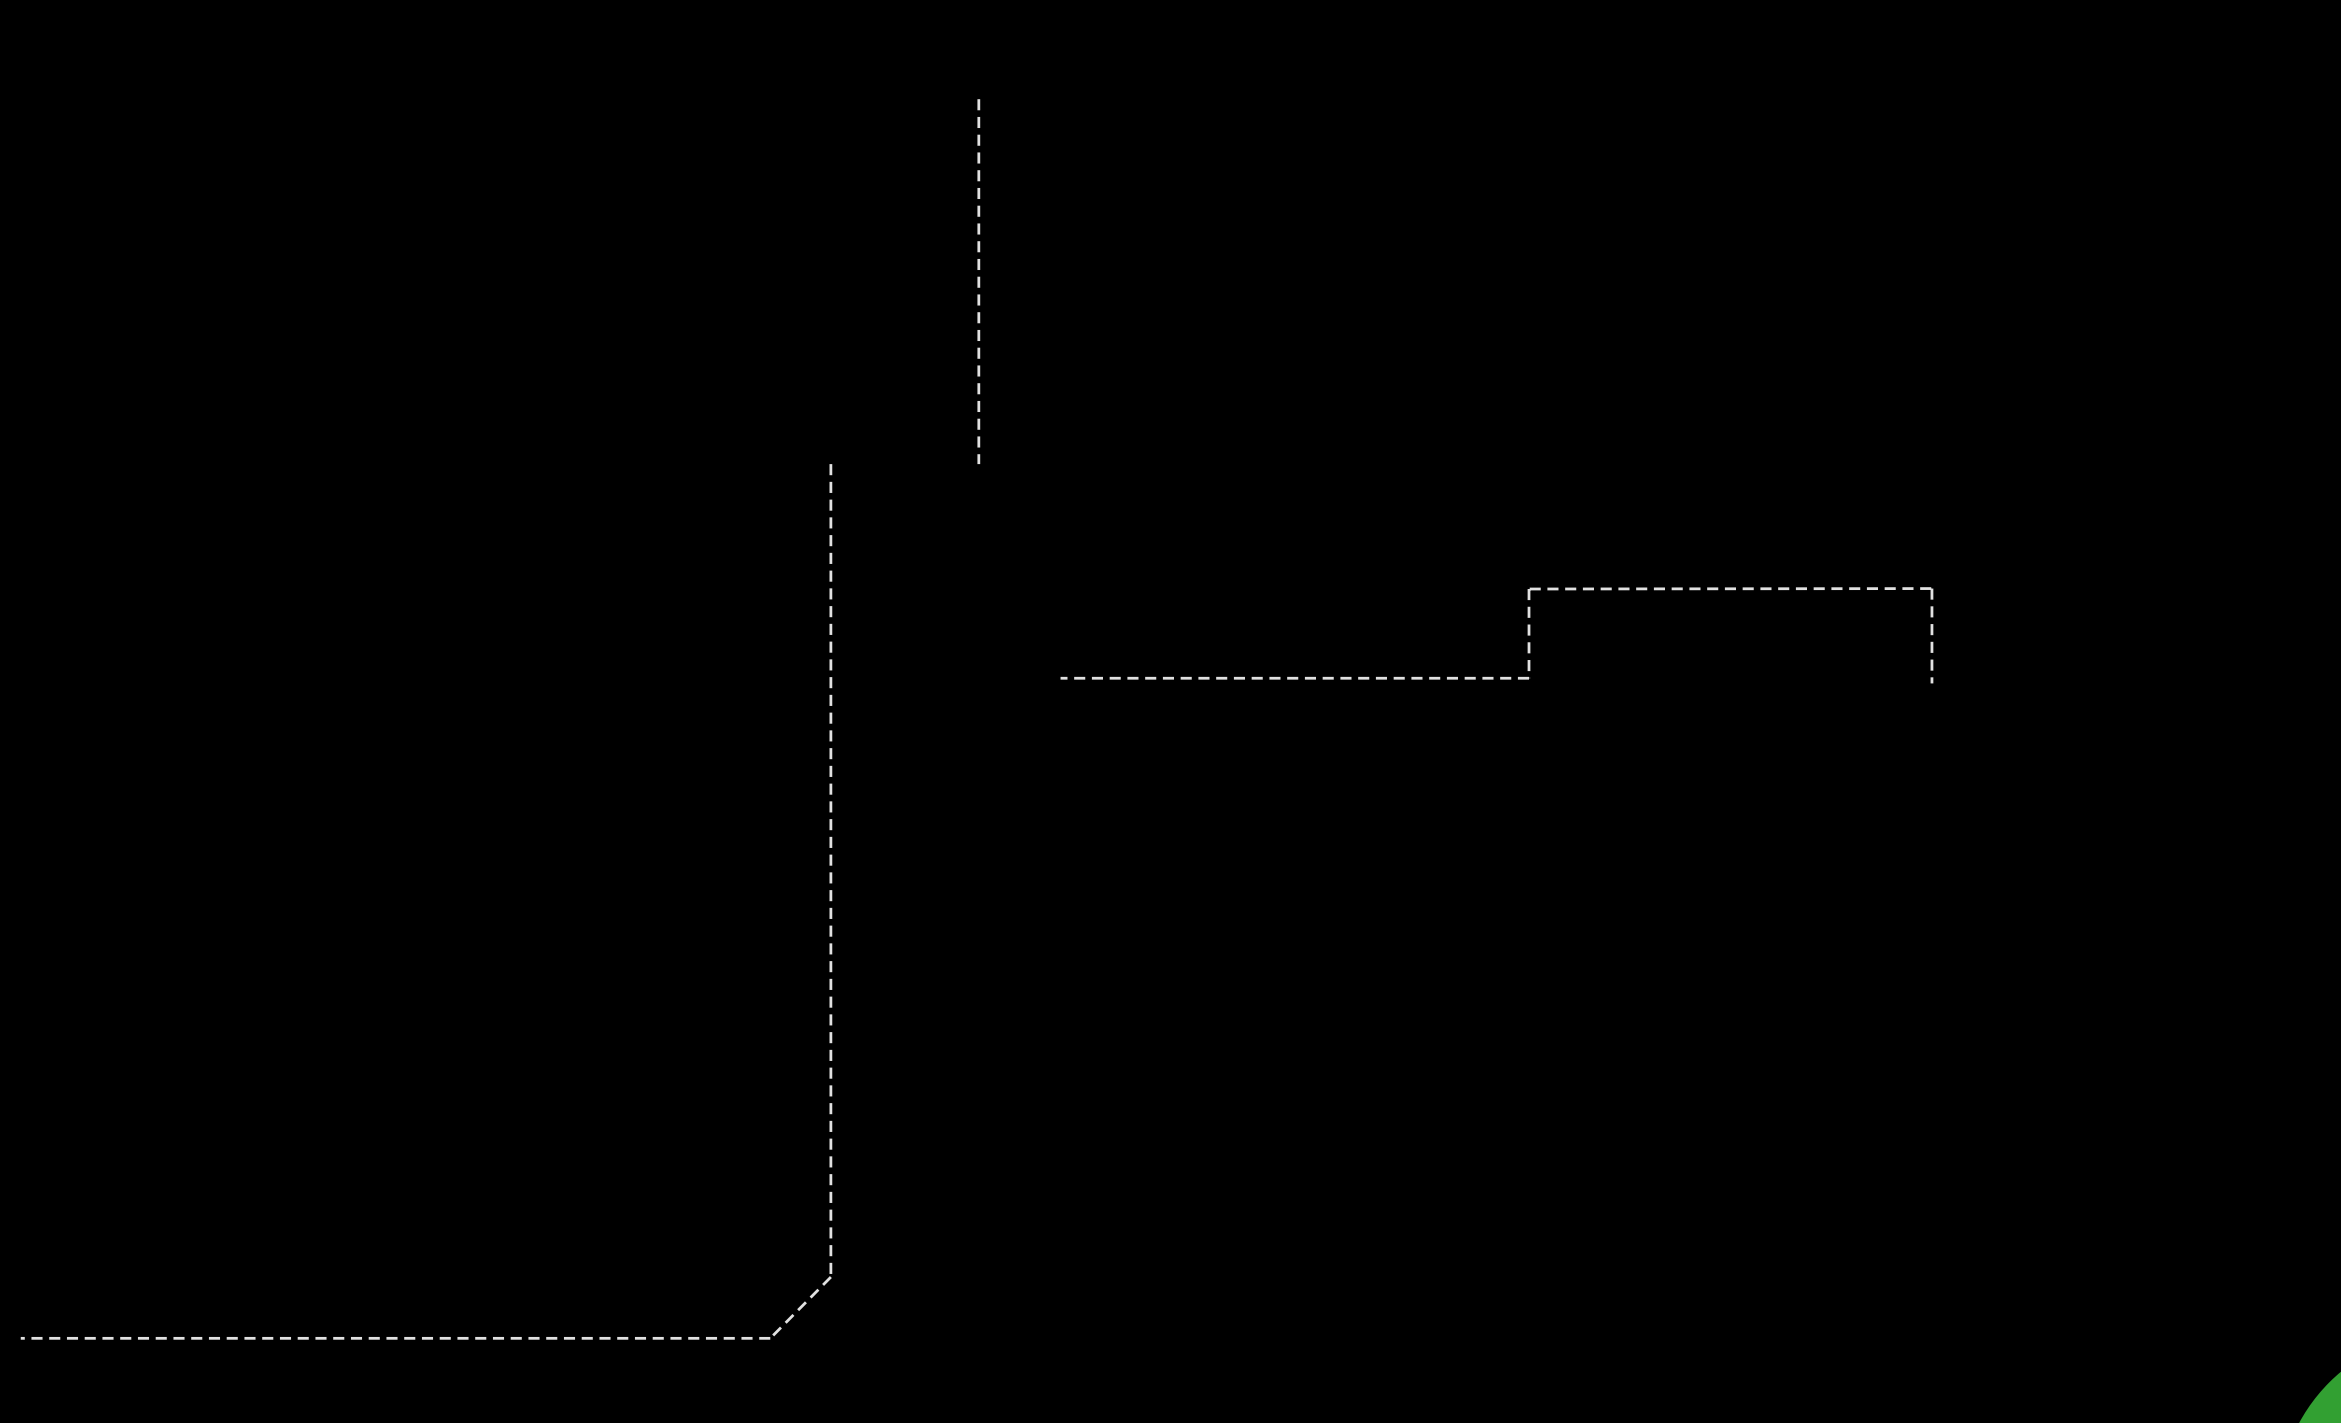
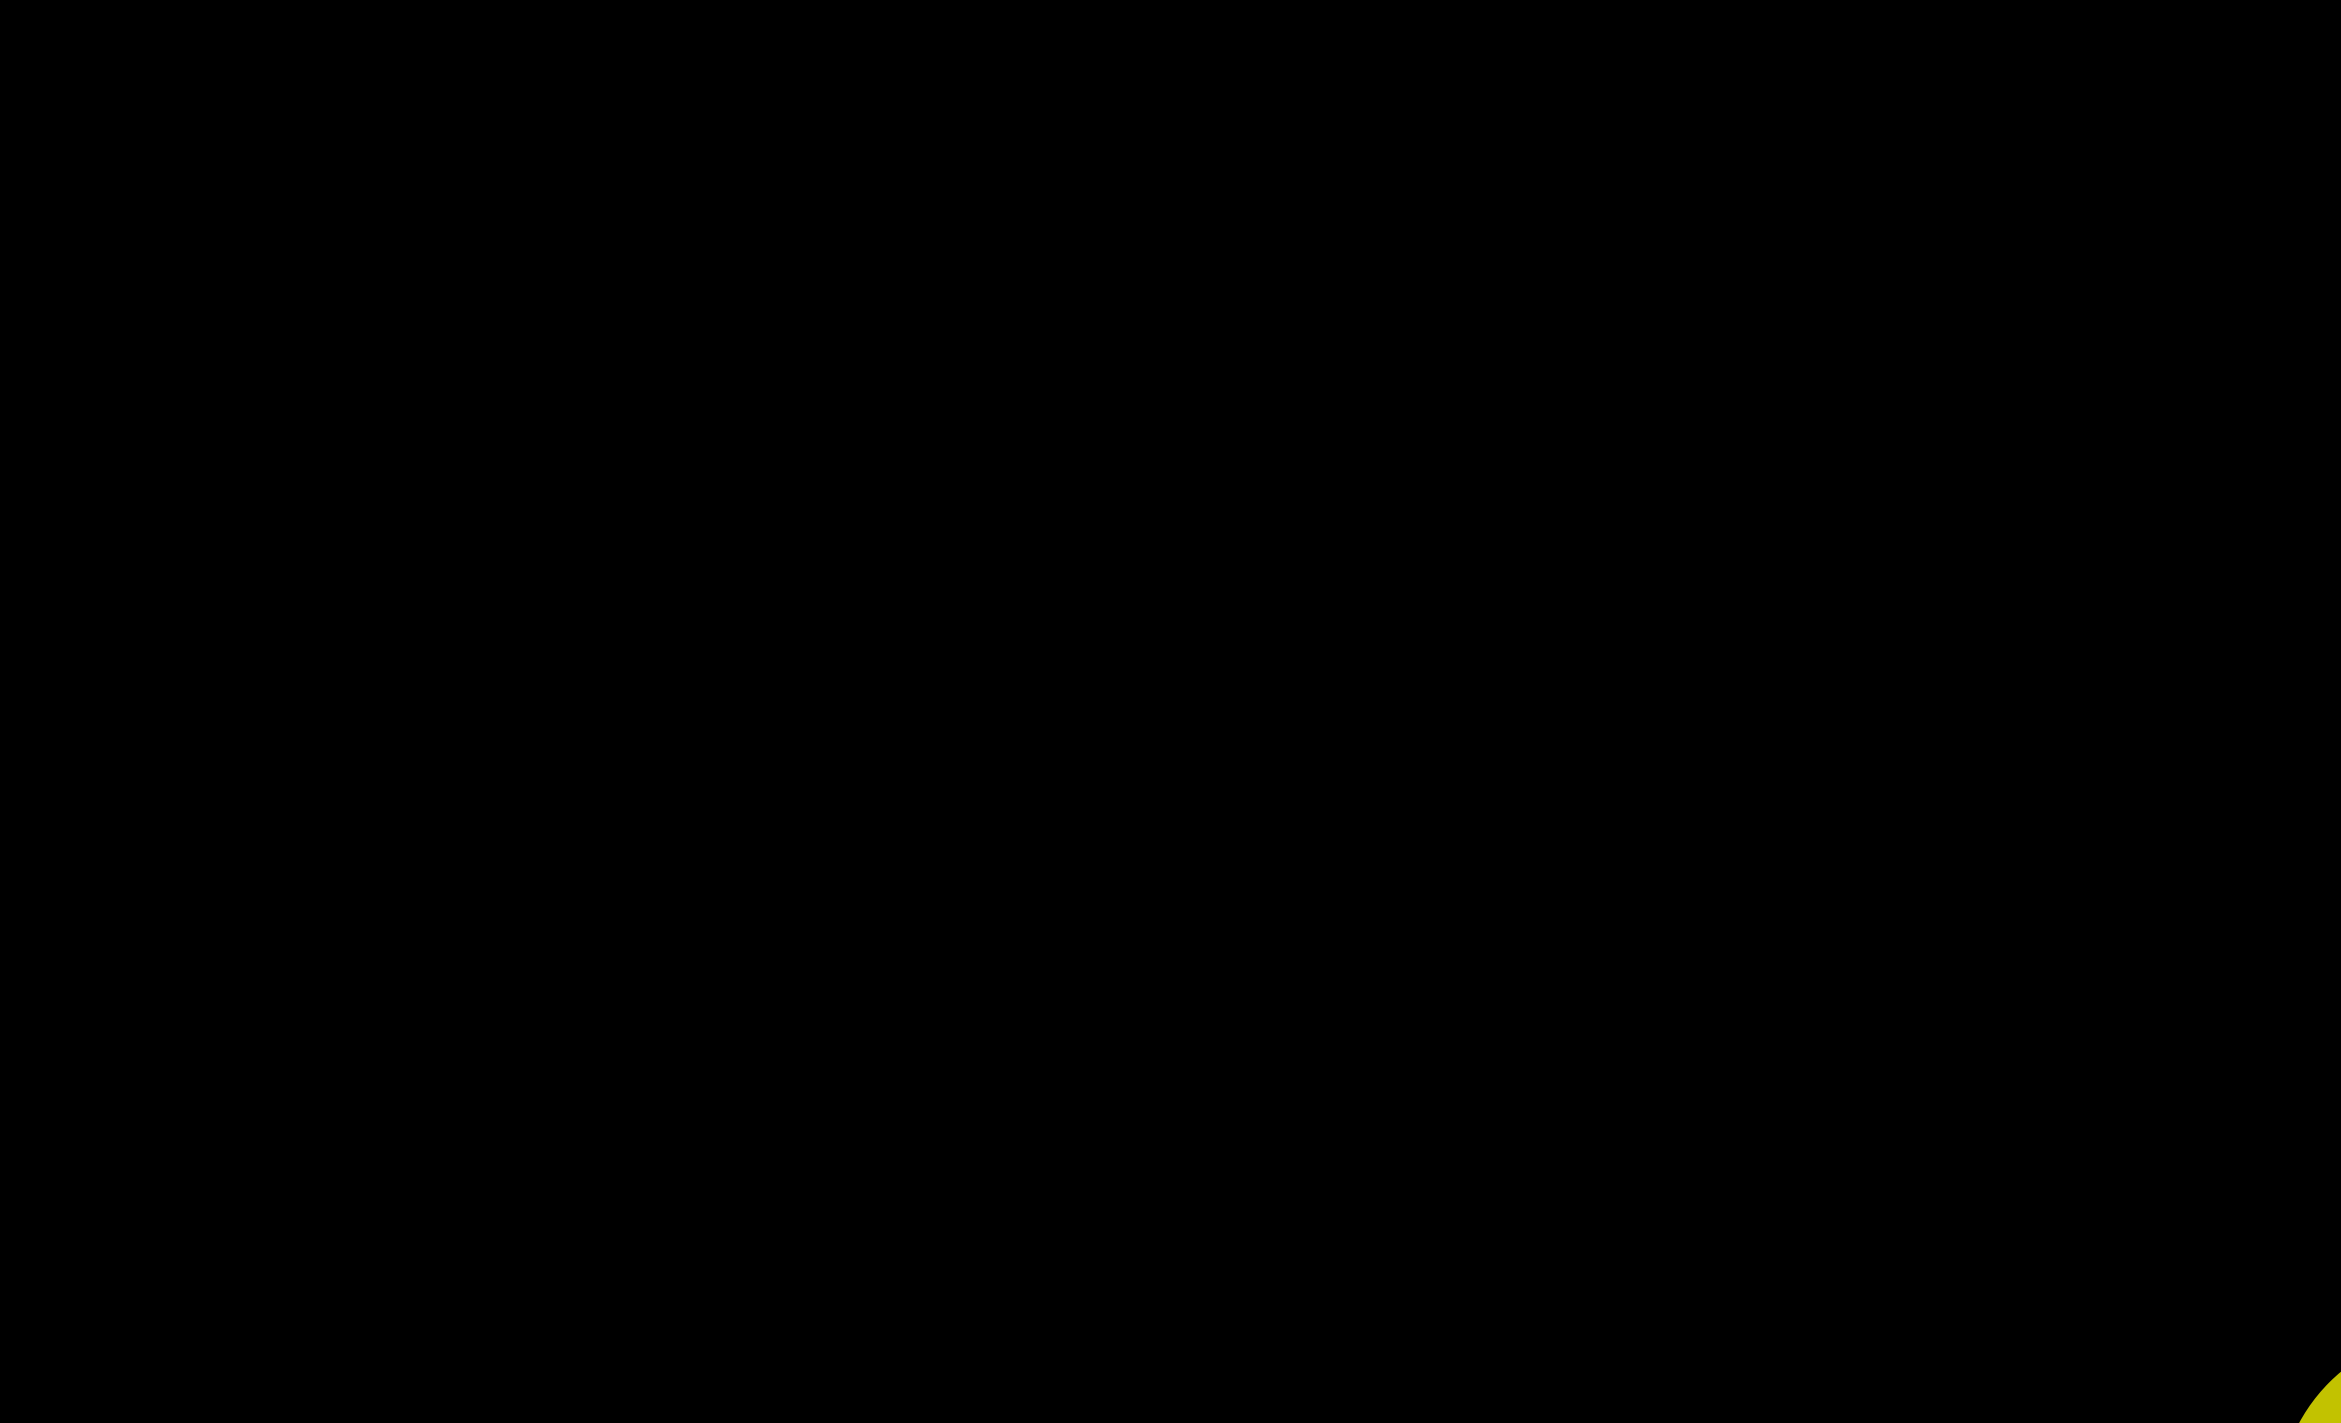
line: (978, 99) (978, 464) -> none
line: (830, 464) (830, 1277) (770, 1338) (20, 1338) -> none
line: (1931, 588) (1529, 589) -> none
line: (1931, 588) (1931, 683) -> none
line: (1529, 589) (1529, 678) (1060, 678) -> none

